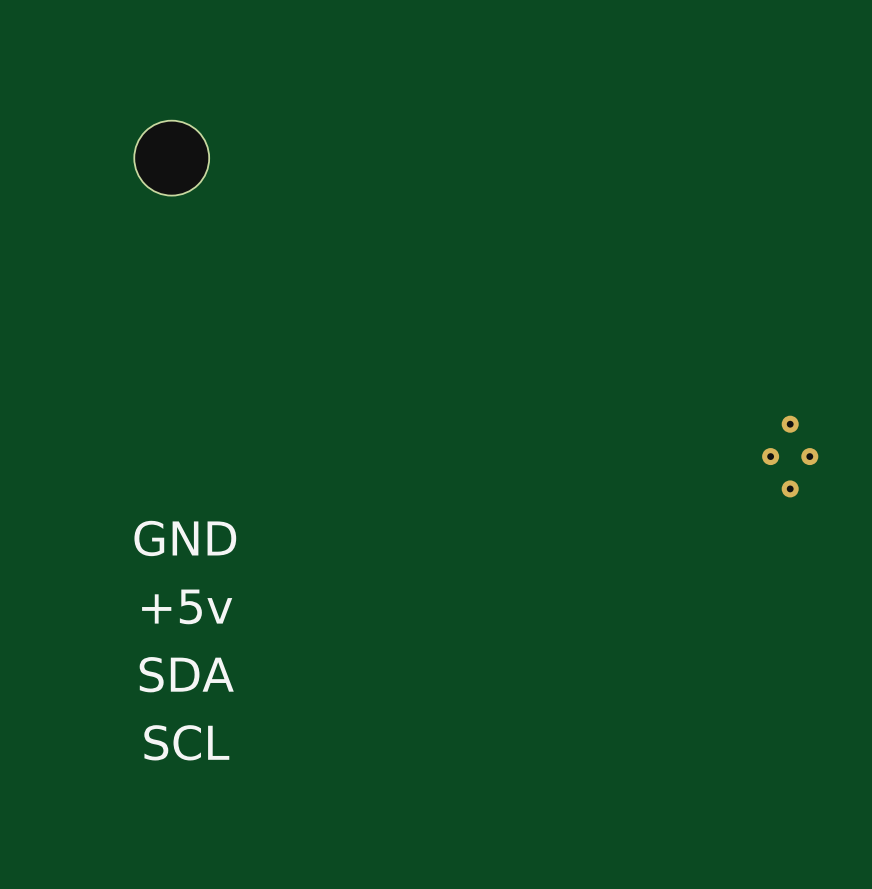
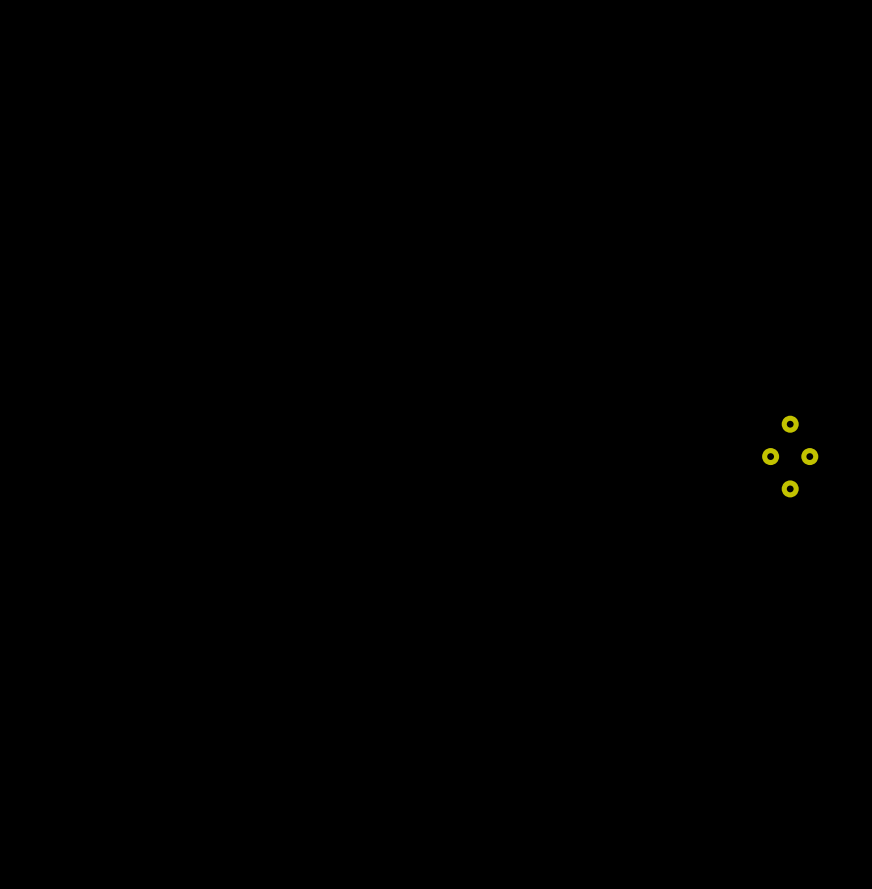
part: (171, 158) -> none
text: GND (185, 538) -> none
text: +5v (187, 606) -> none
text: SDA (186, 674) -> none
text: SCL (186, 742) -> none

